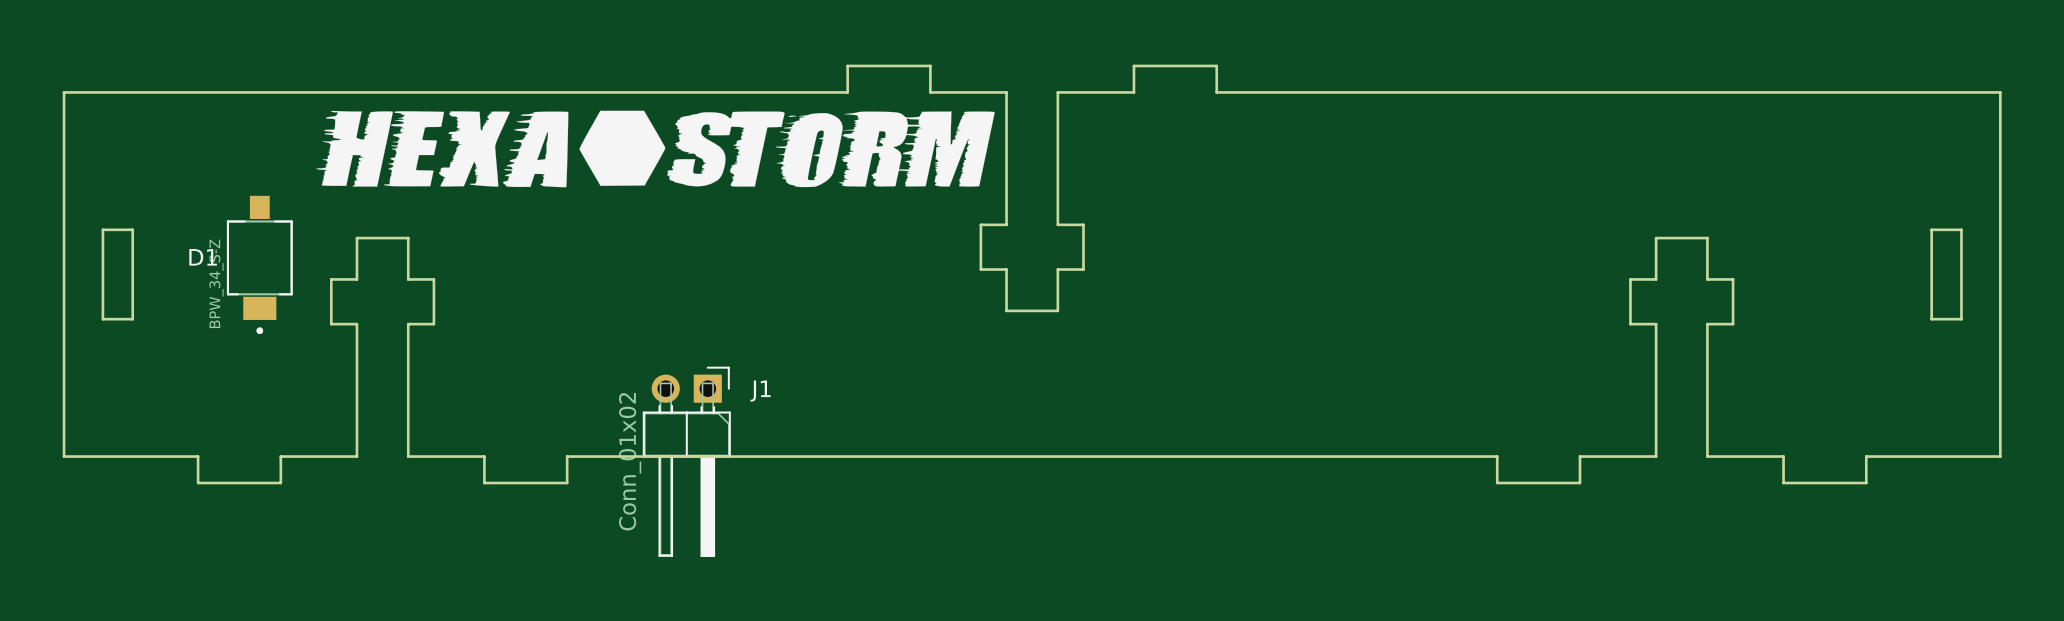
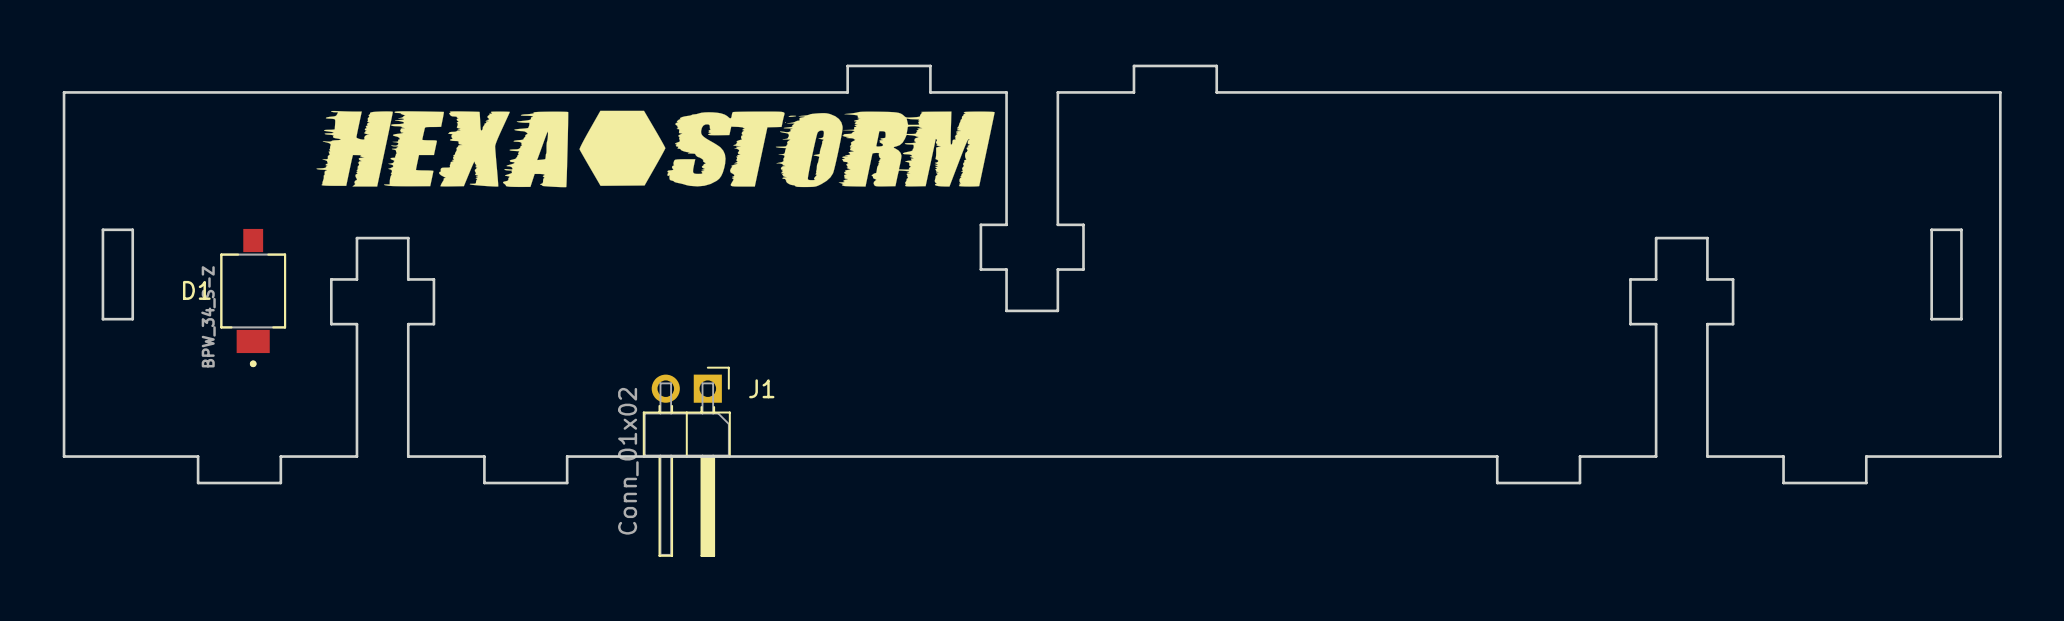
D1 position: (259, 264) -> (253, 298)

